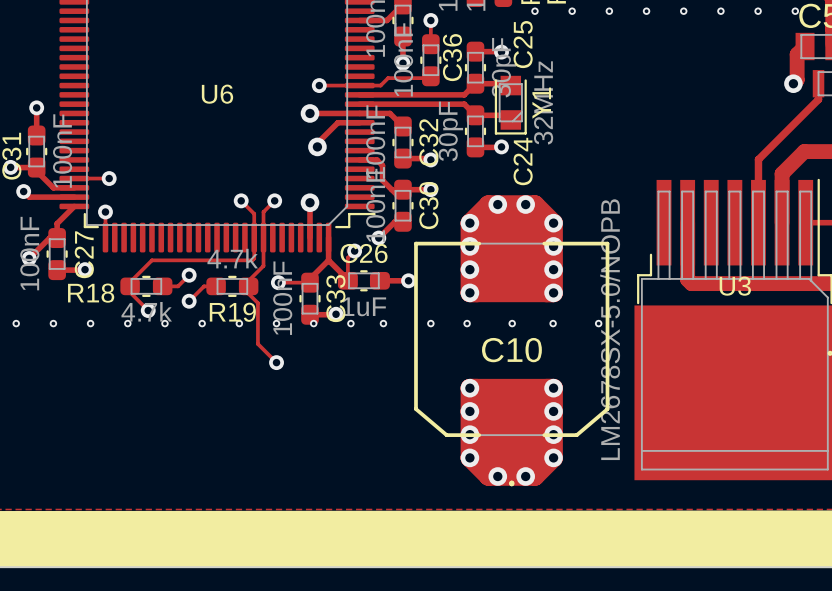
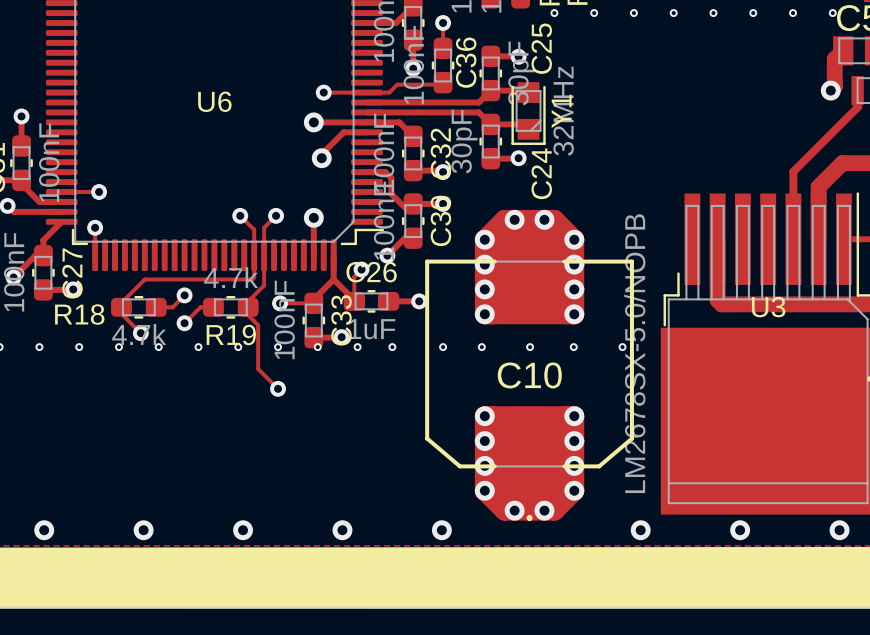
via: none -> (44, 530)
via: none -> (143, 530)
via: none -> (243, 530)
via: none -> (342, 530)
via: none -> (441, 530)
via: none -> (640, 530)
via: none -> (740, 530)
via: none -> (839, 530)

